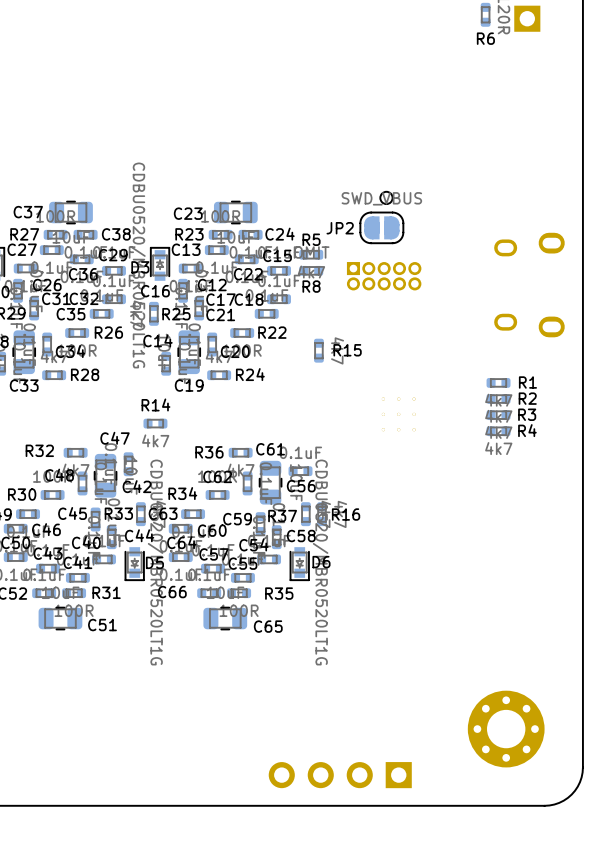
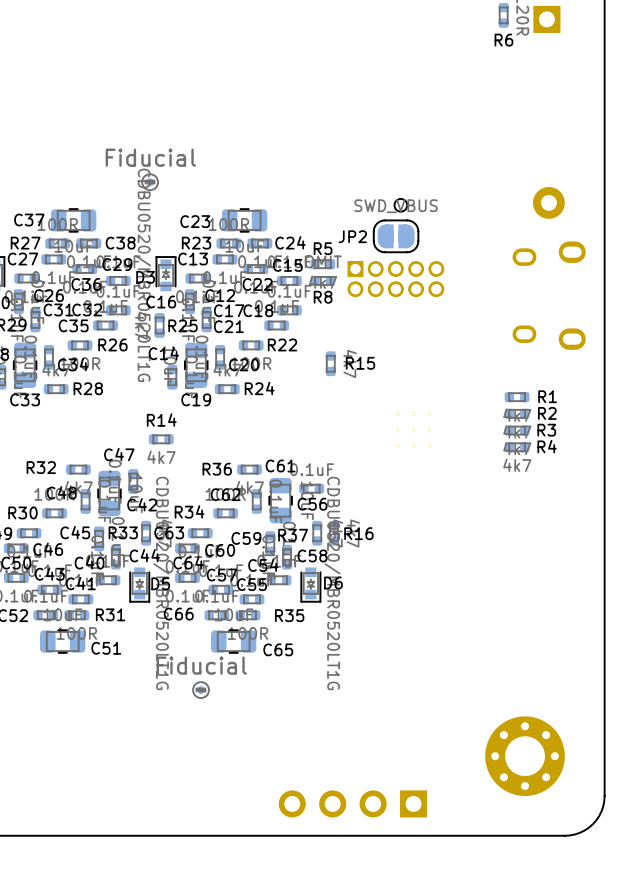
part: none -> Fiducial (150, 182)
part: none -> (548, 202)
part footprint: [346, 262, 422, 291] -> [347, 261, 445, 298]
part: none -> Fiducial (201, 690)

